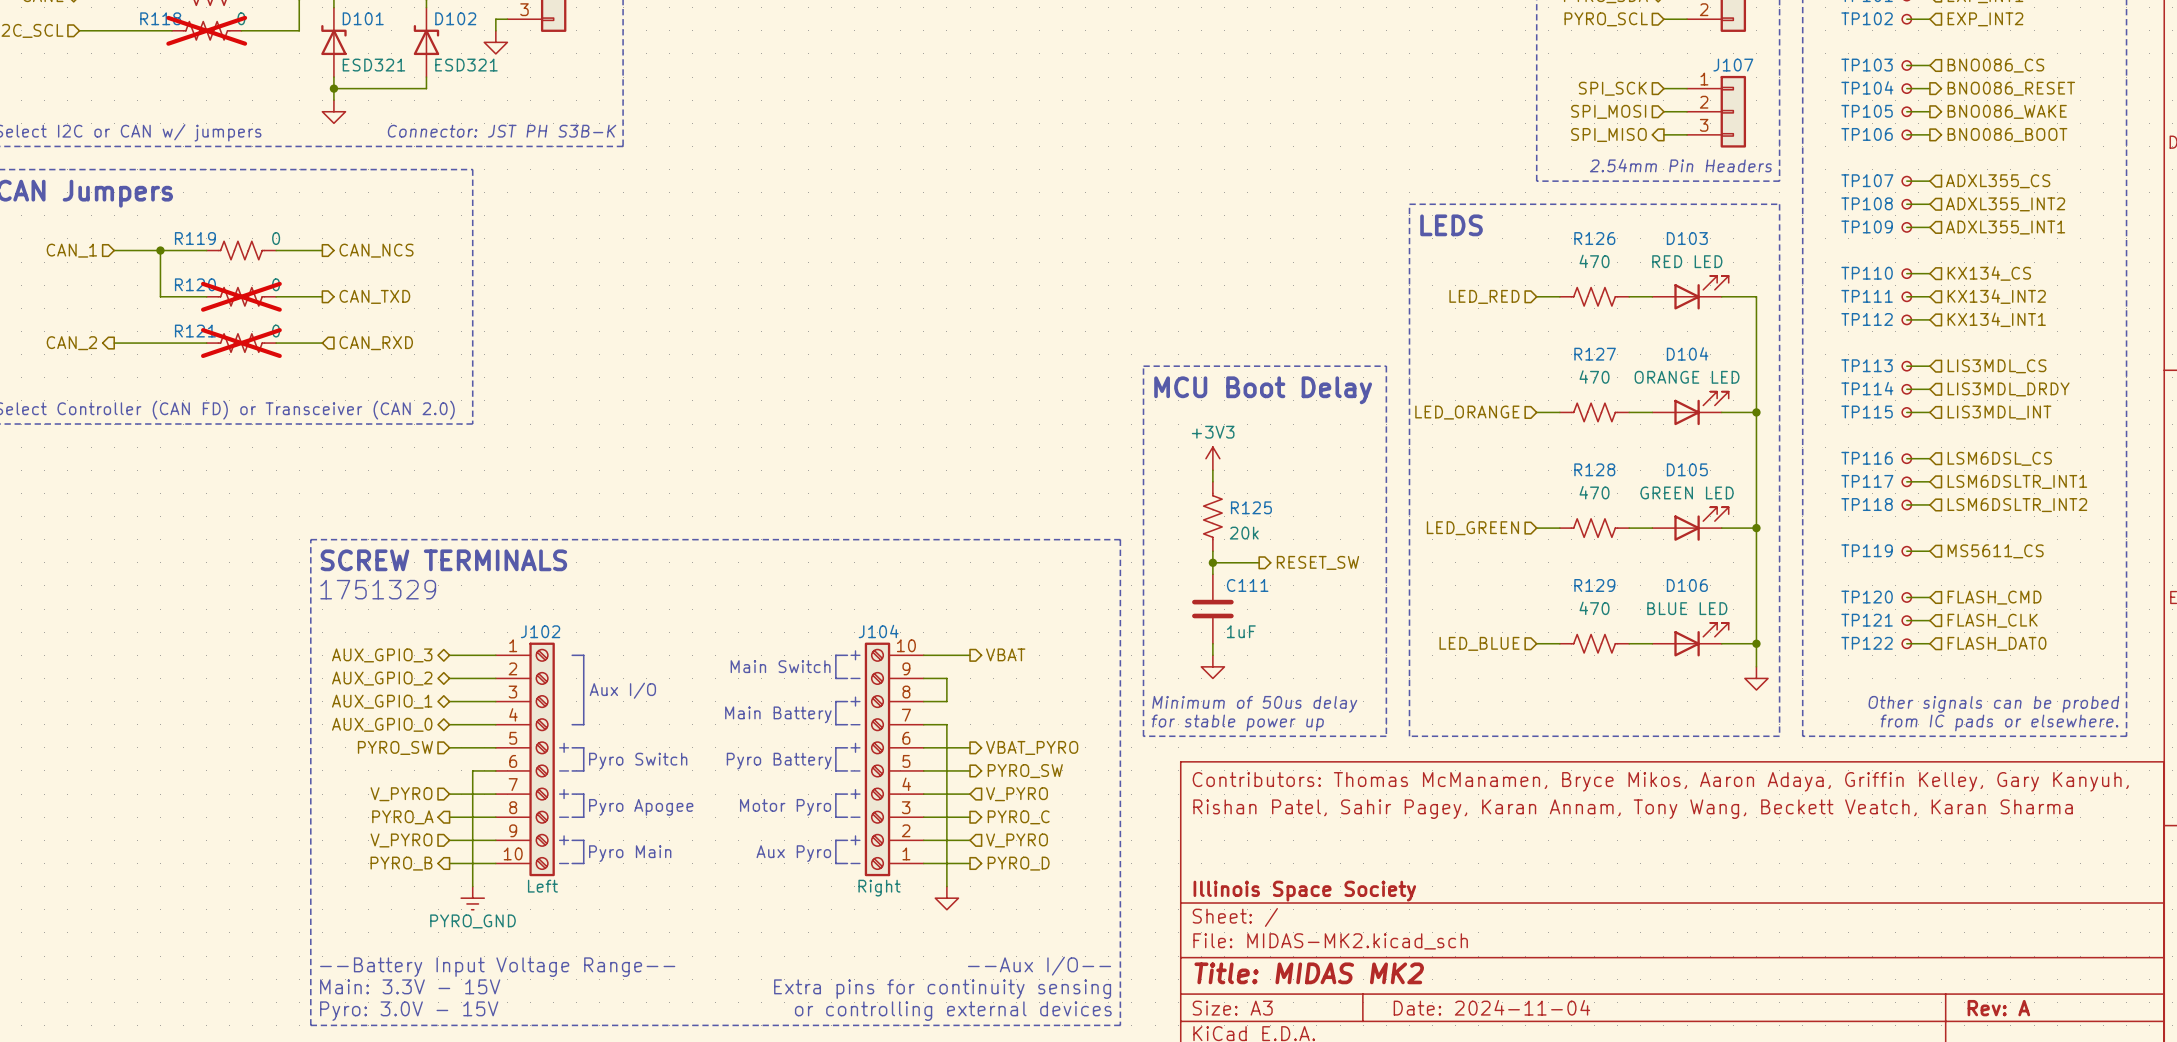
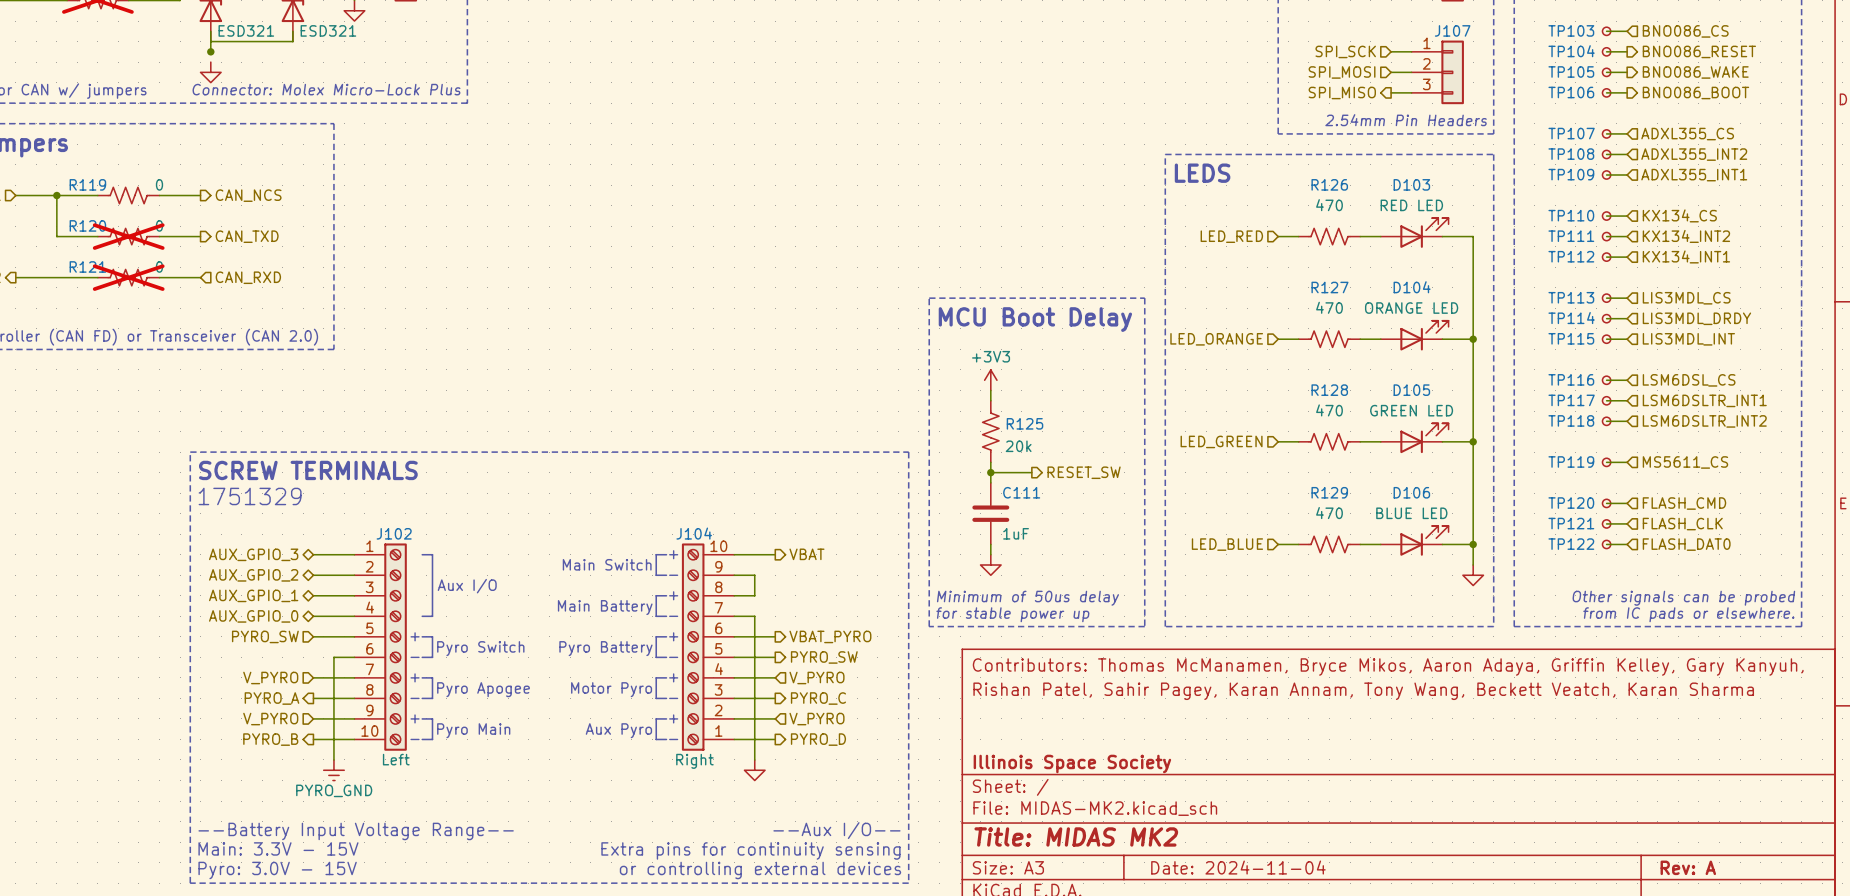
wire: none -> (210, 31) (210, 41) (292, 41) (292, 31)
wire: (426, 77) (426, 88) (333, 88) (333, 100) -> none
text: Connector: JST PH S3B-K (502, 131) -> Connector: Molex Micro-Lock Plus (326, 89)

